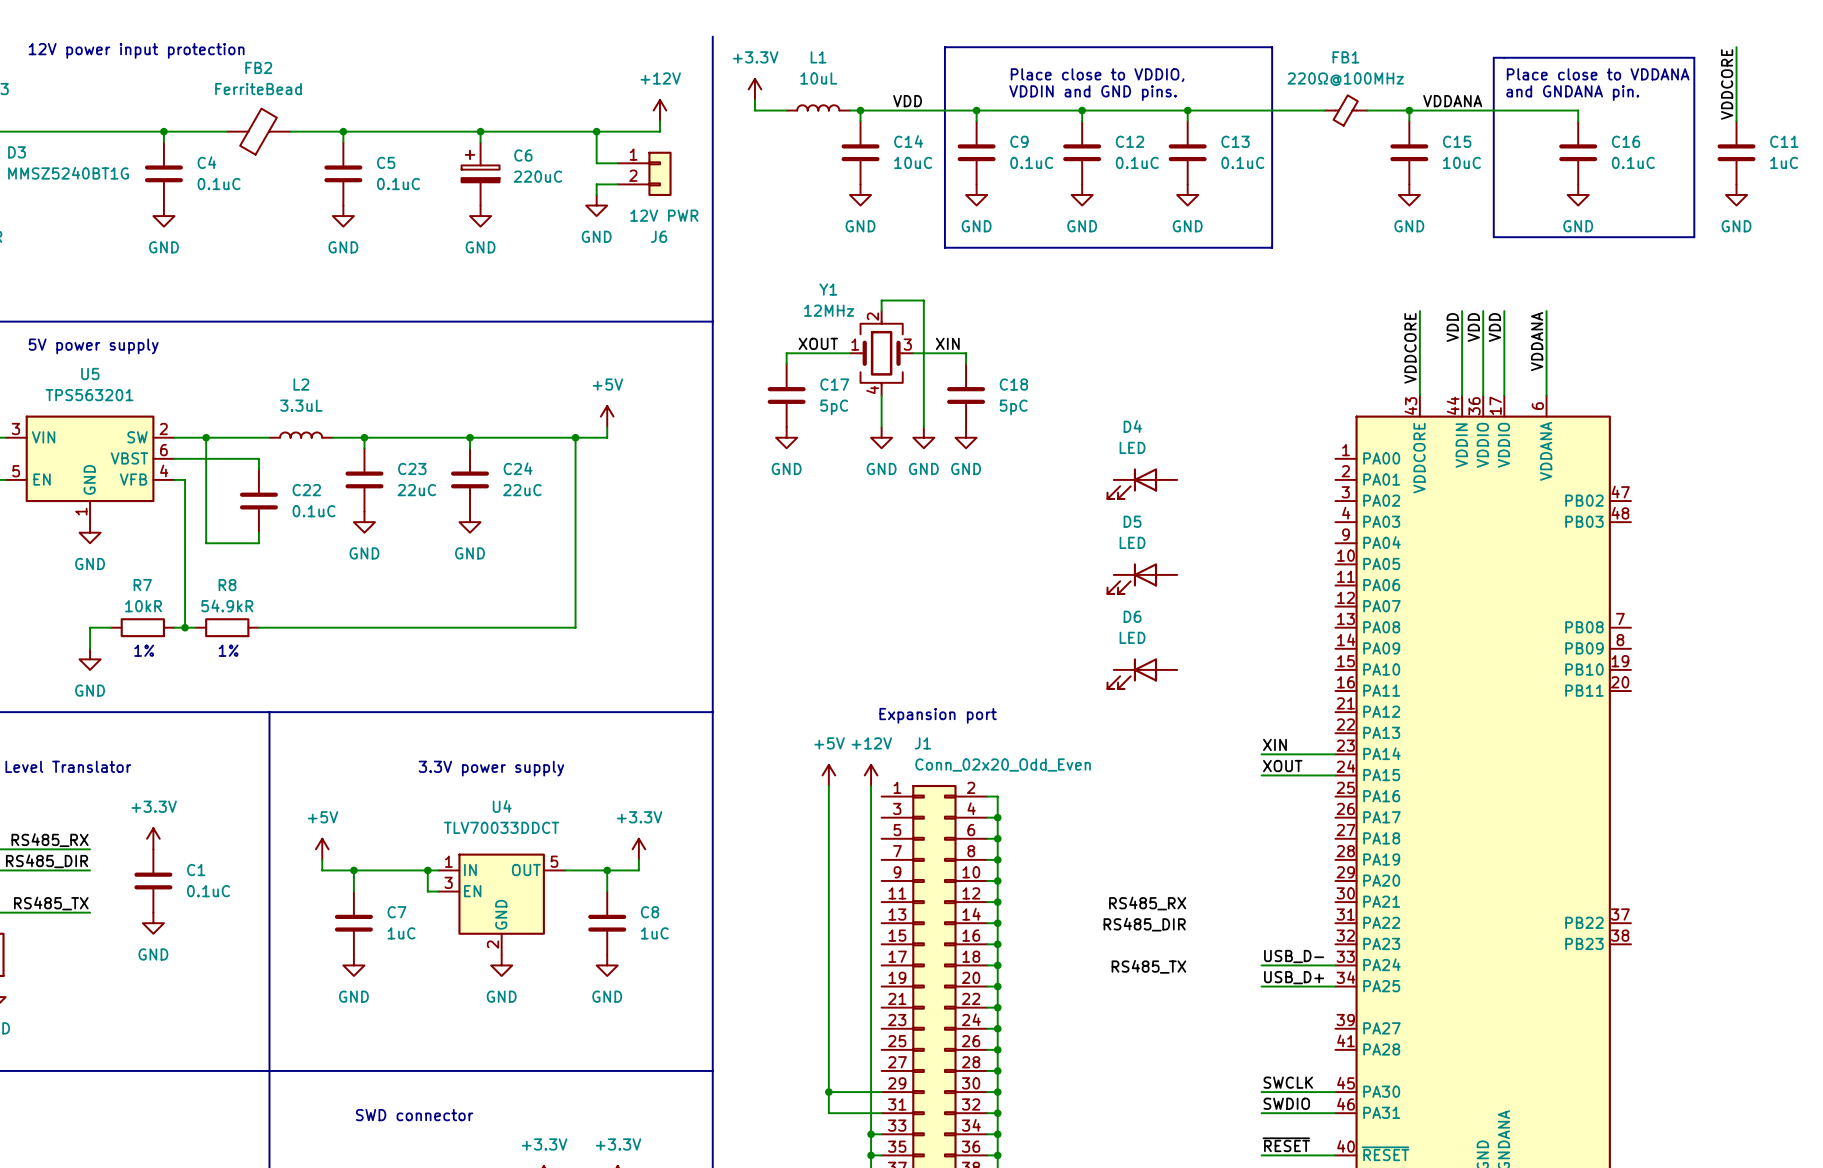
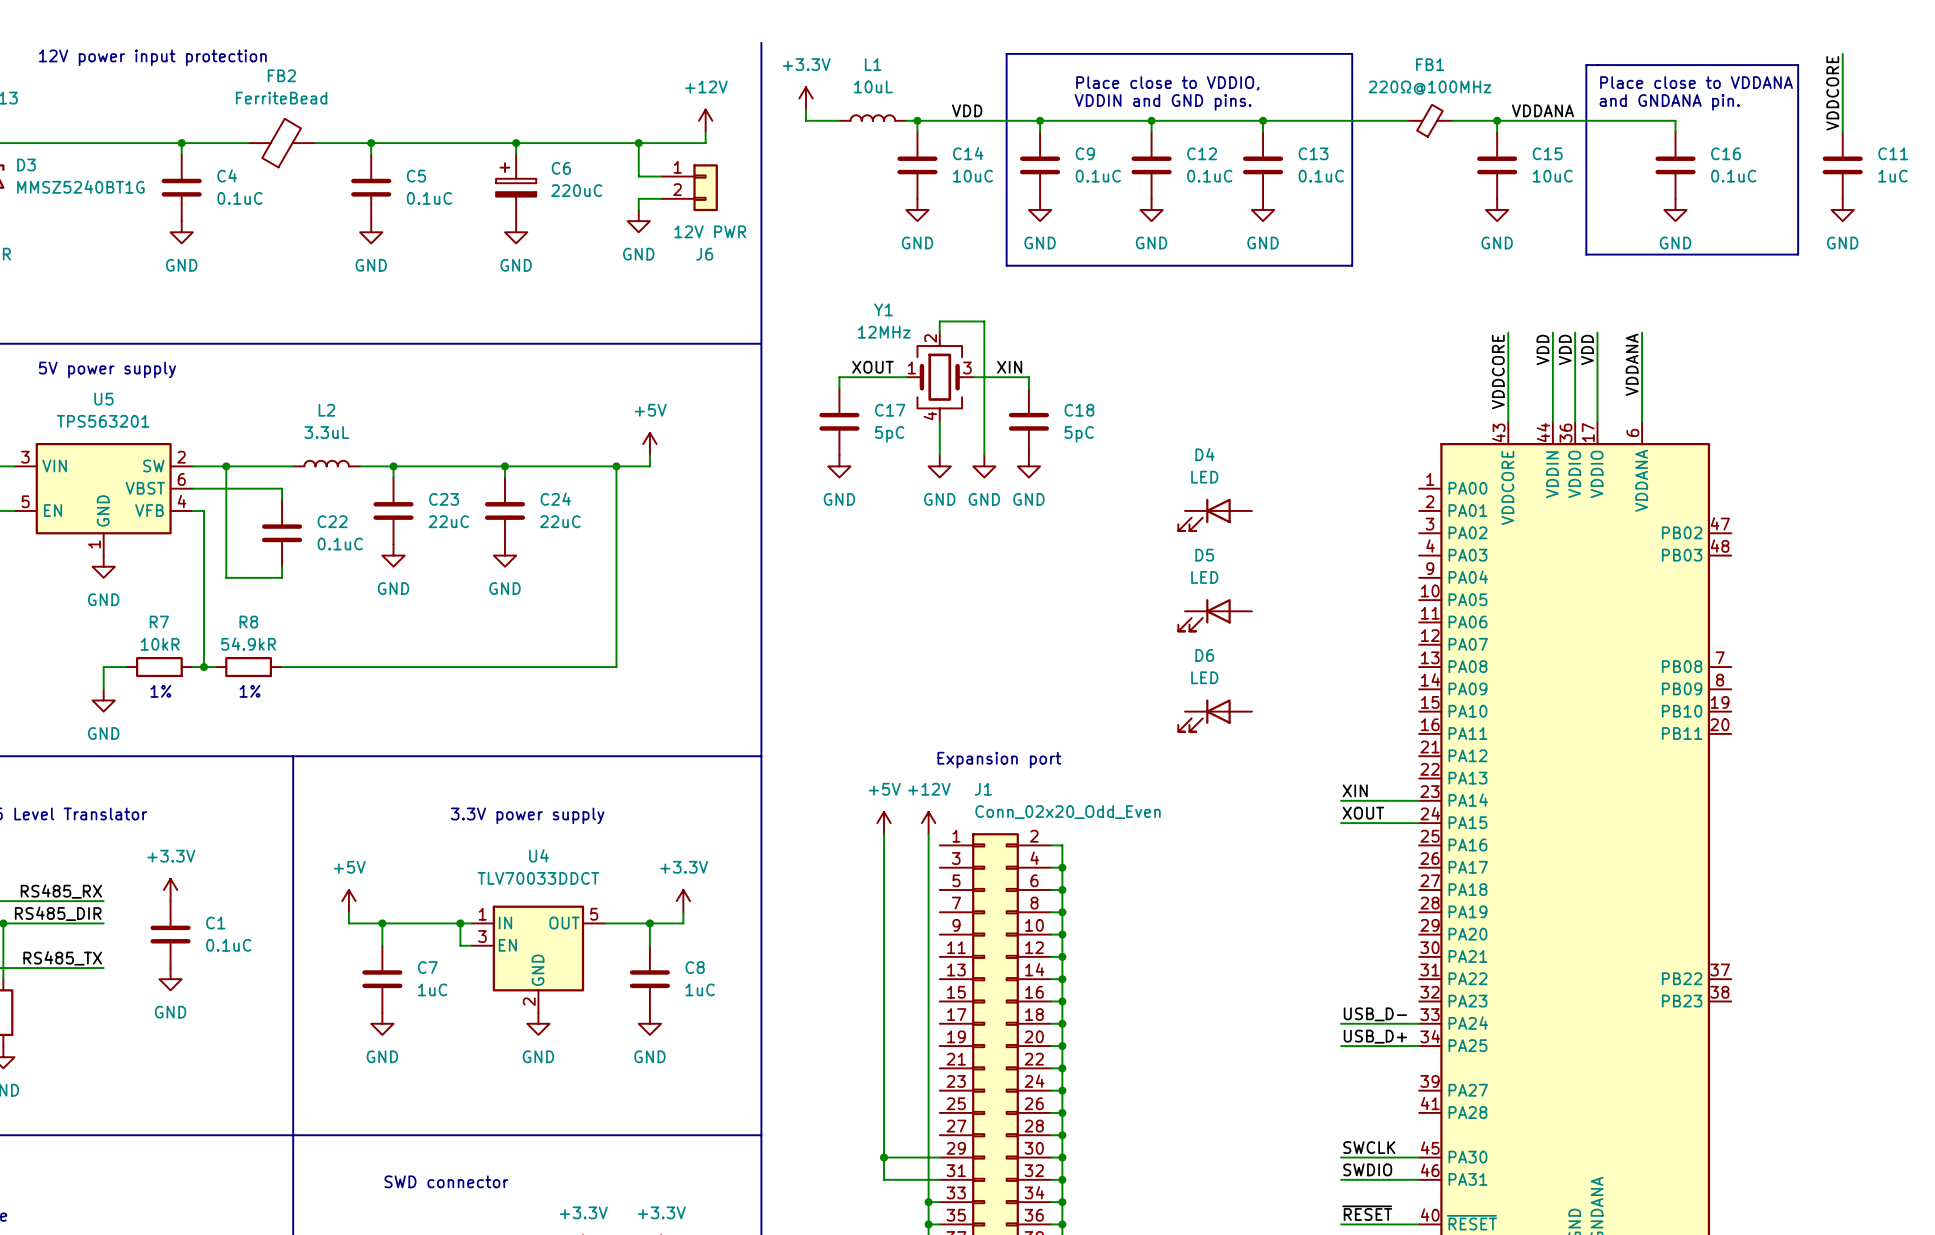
label: RS485_RX (1147, 903) -> none
label: RS485_DIR (1144, 924) -> none
label: RS485_TX (1148, 966) -> none

